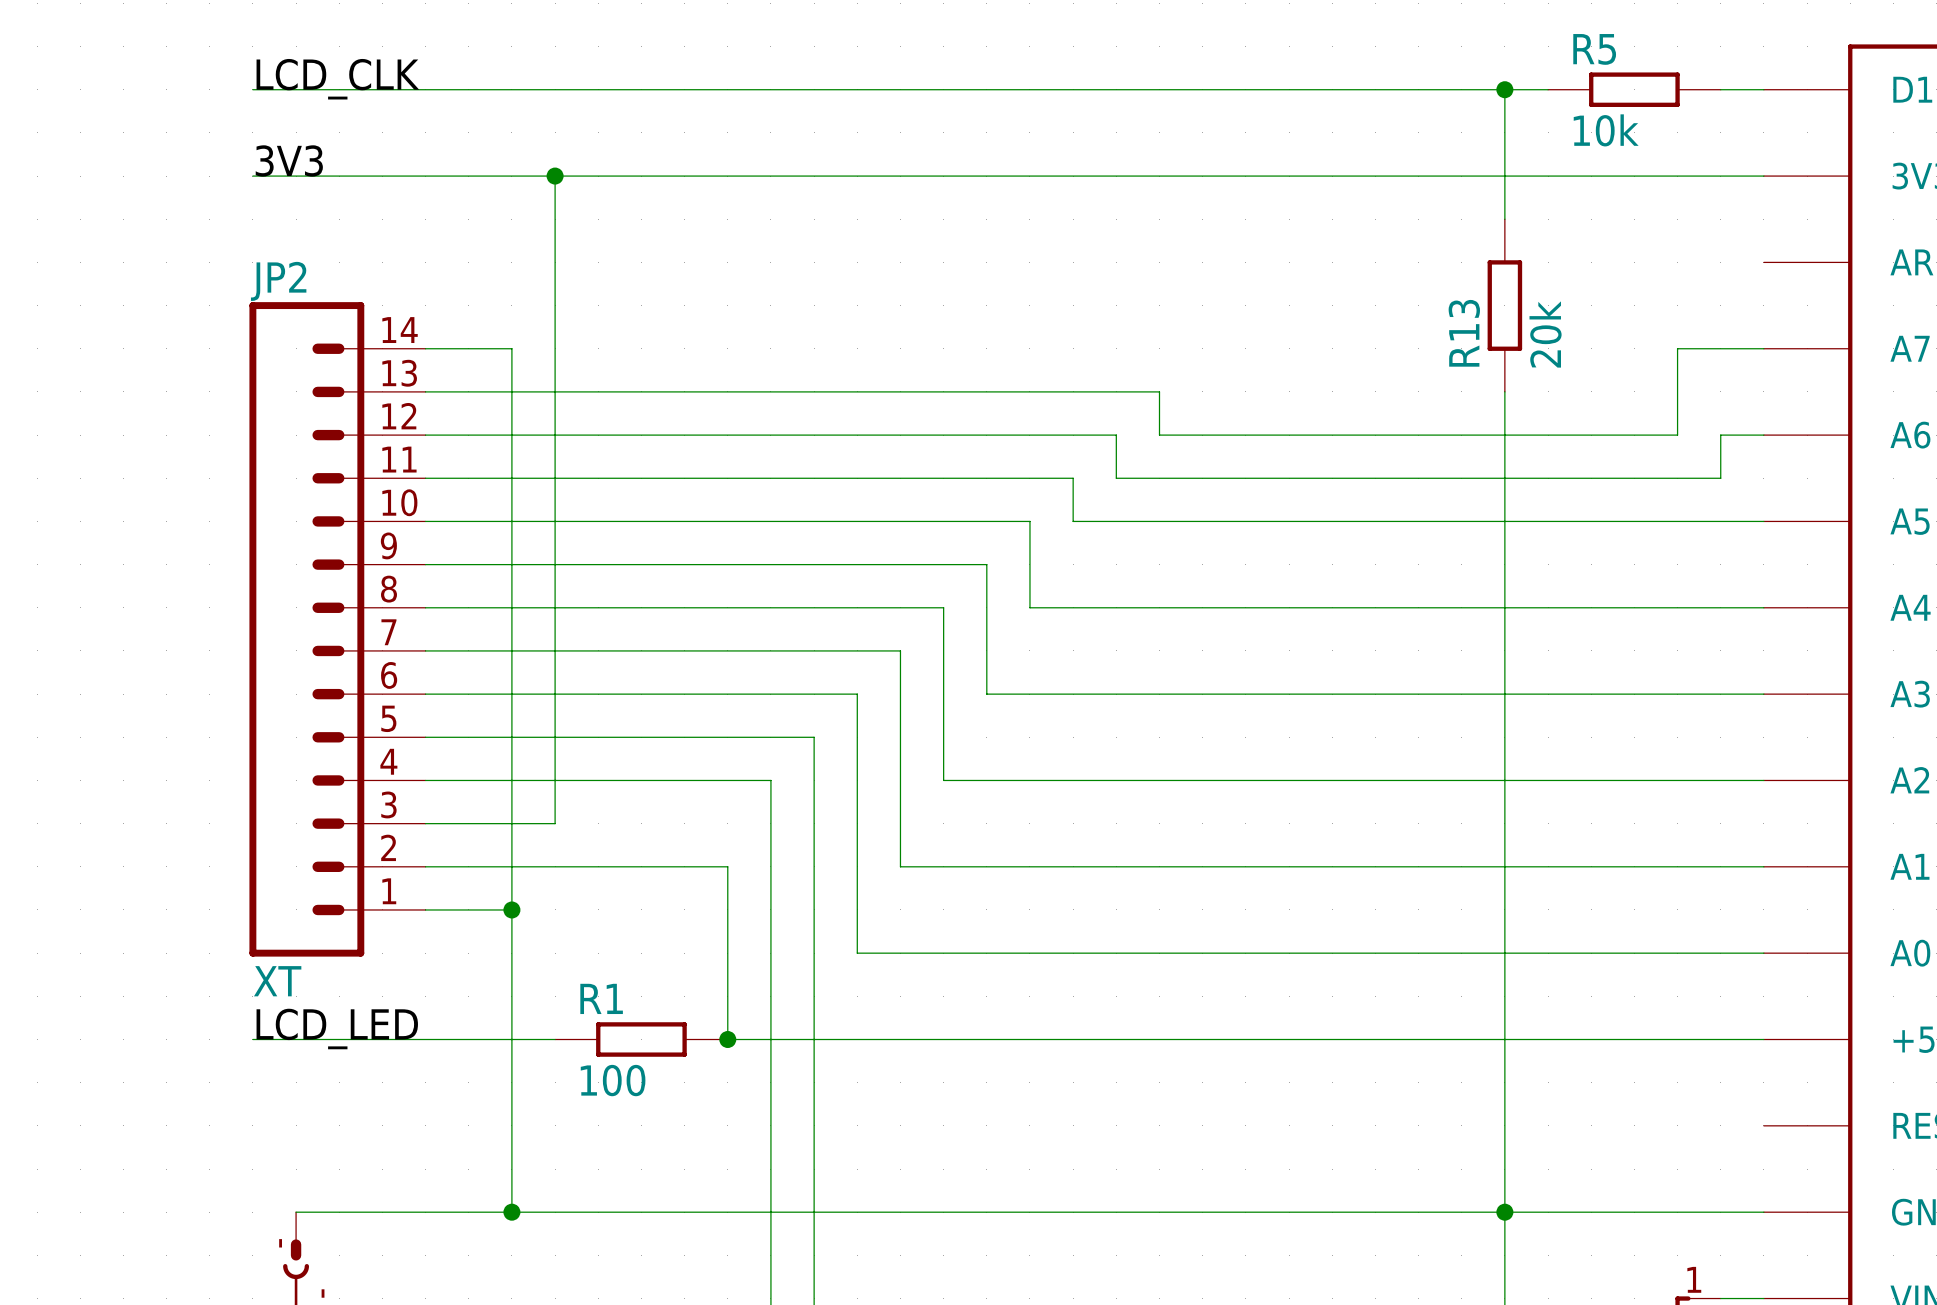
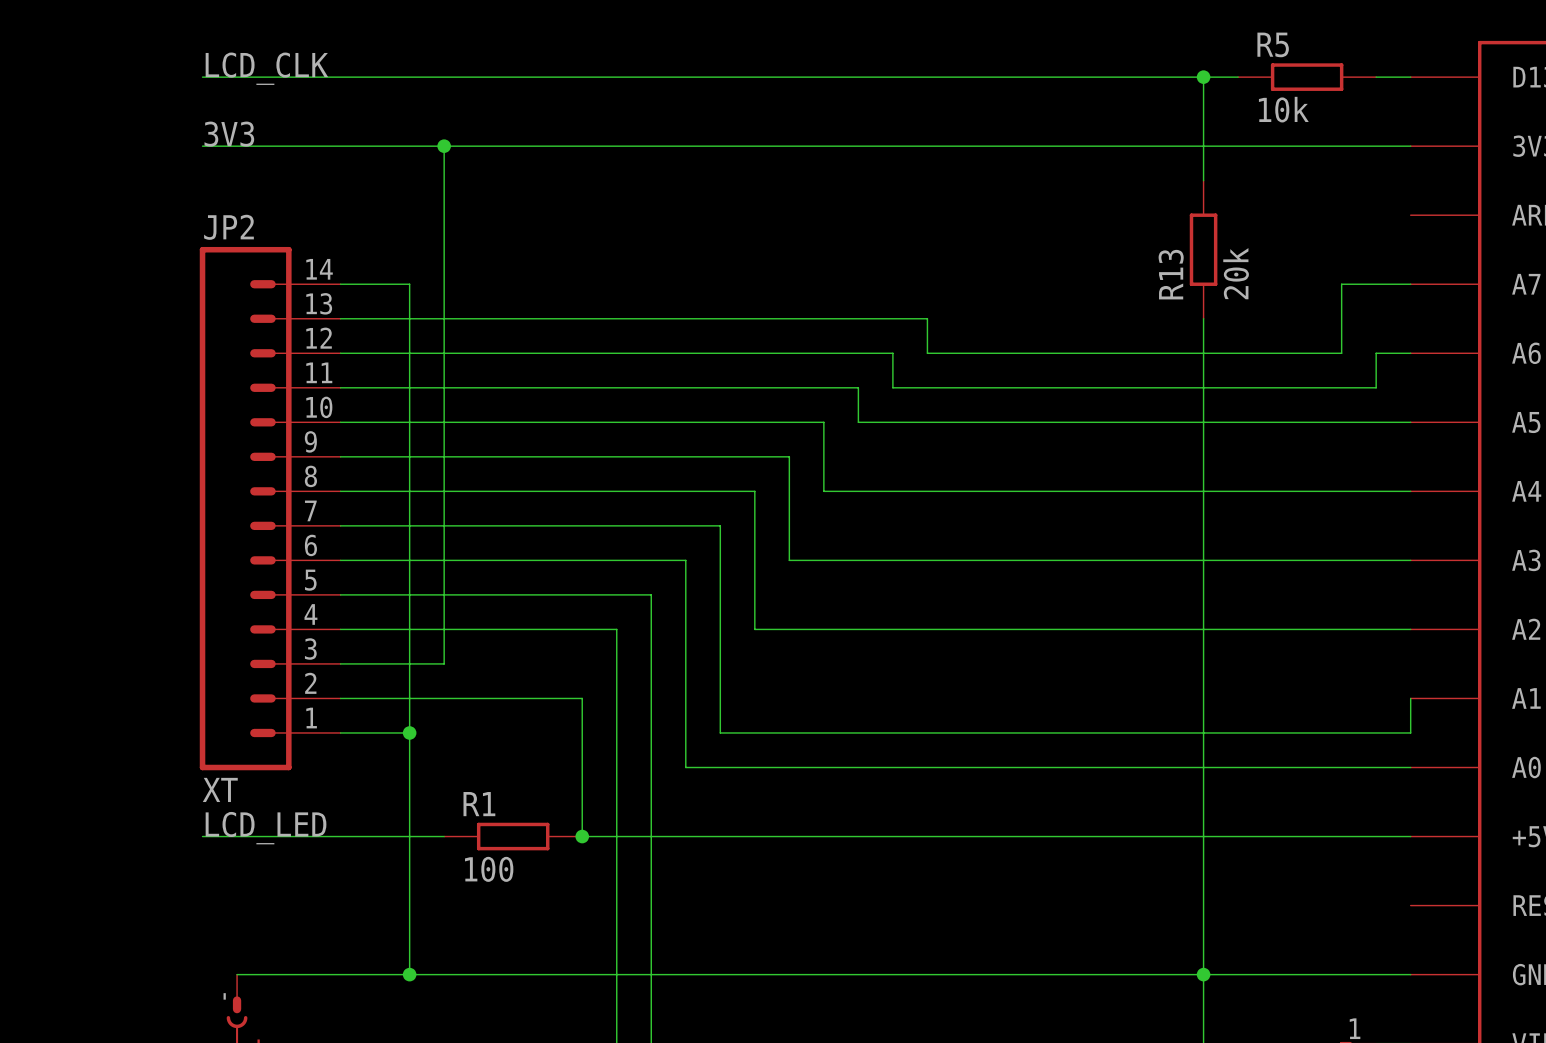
wire: (900, 866) (1763, 866) -> (720, 698) (720, 732) (1410, 732) (1410, 698)

